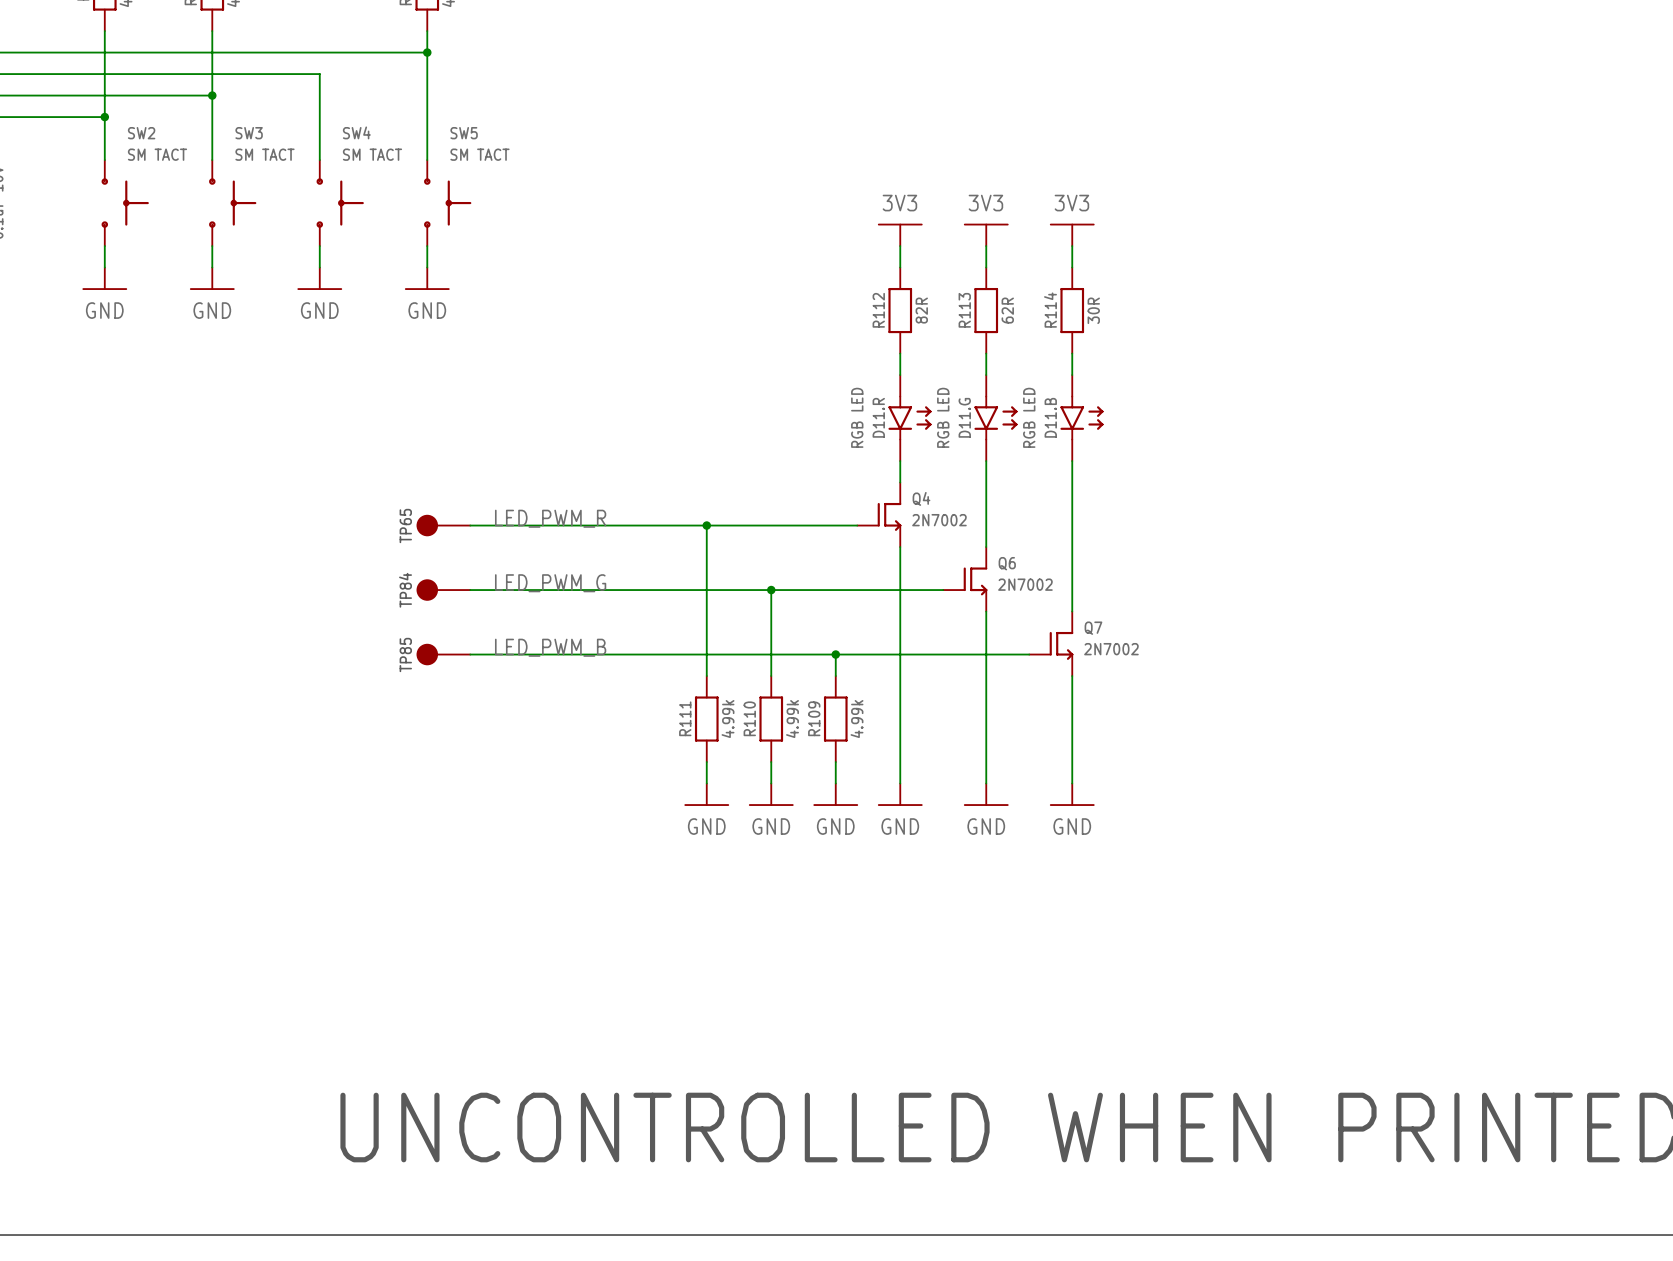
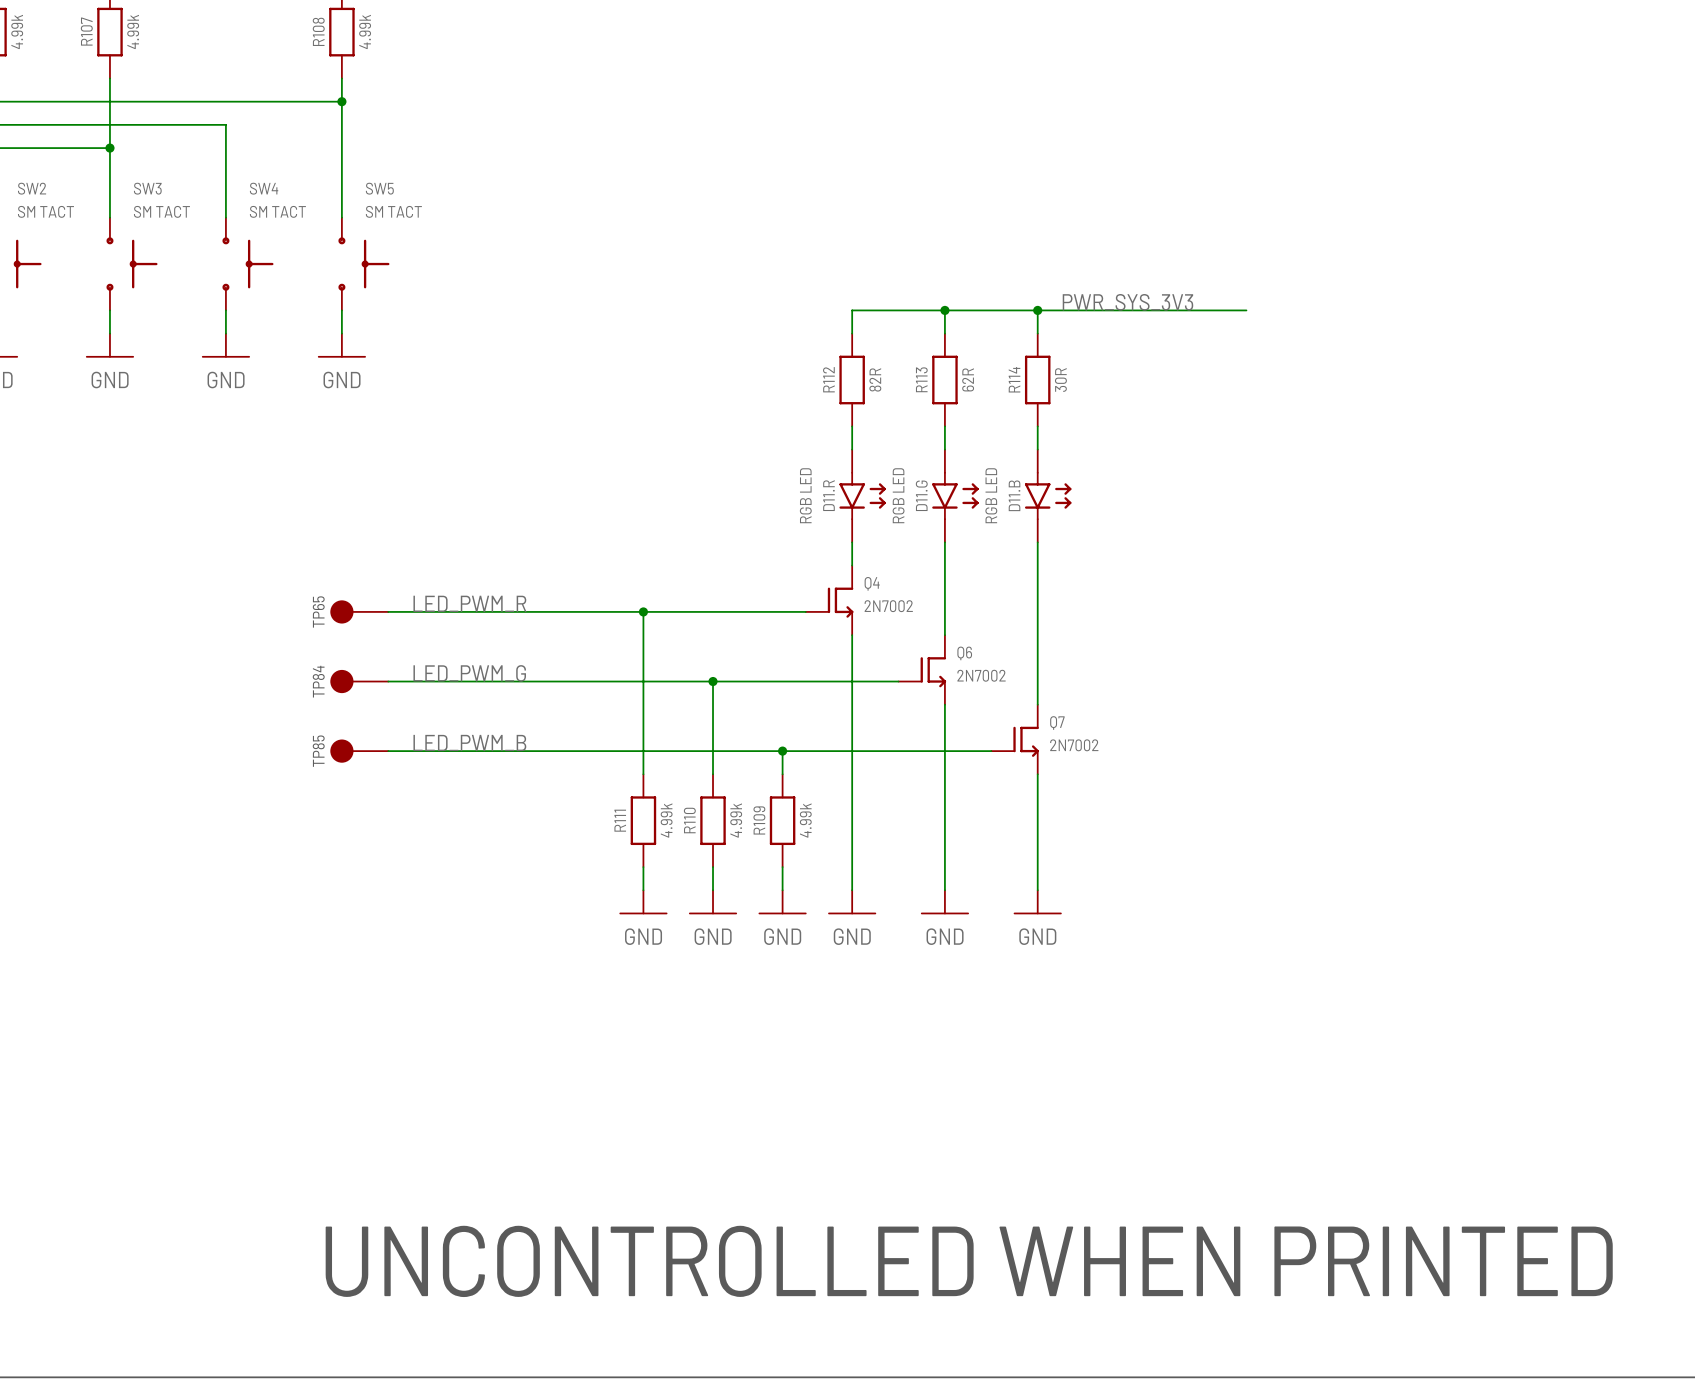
power symbol: 3V3 (900, 234) -> none
power symbol: 3V3 (986, 234) -> none
power symbol: 3V3 (1072, 234) -> none
label: none -> PWR_SYS_3V3 (1127, 302)
wire: none -> (852, 310) (1246, 310)
junction: none -> (944, 310)
junction: none -> (1037, 310)

